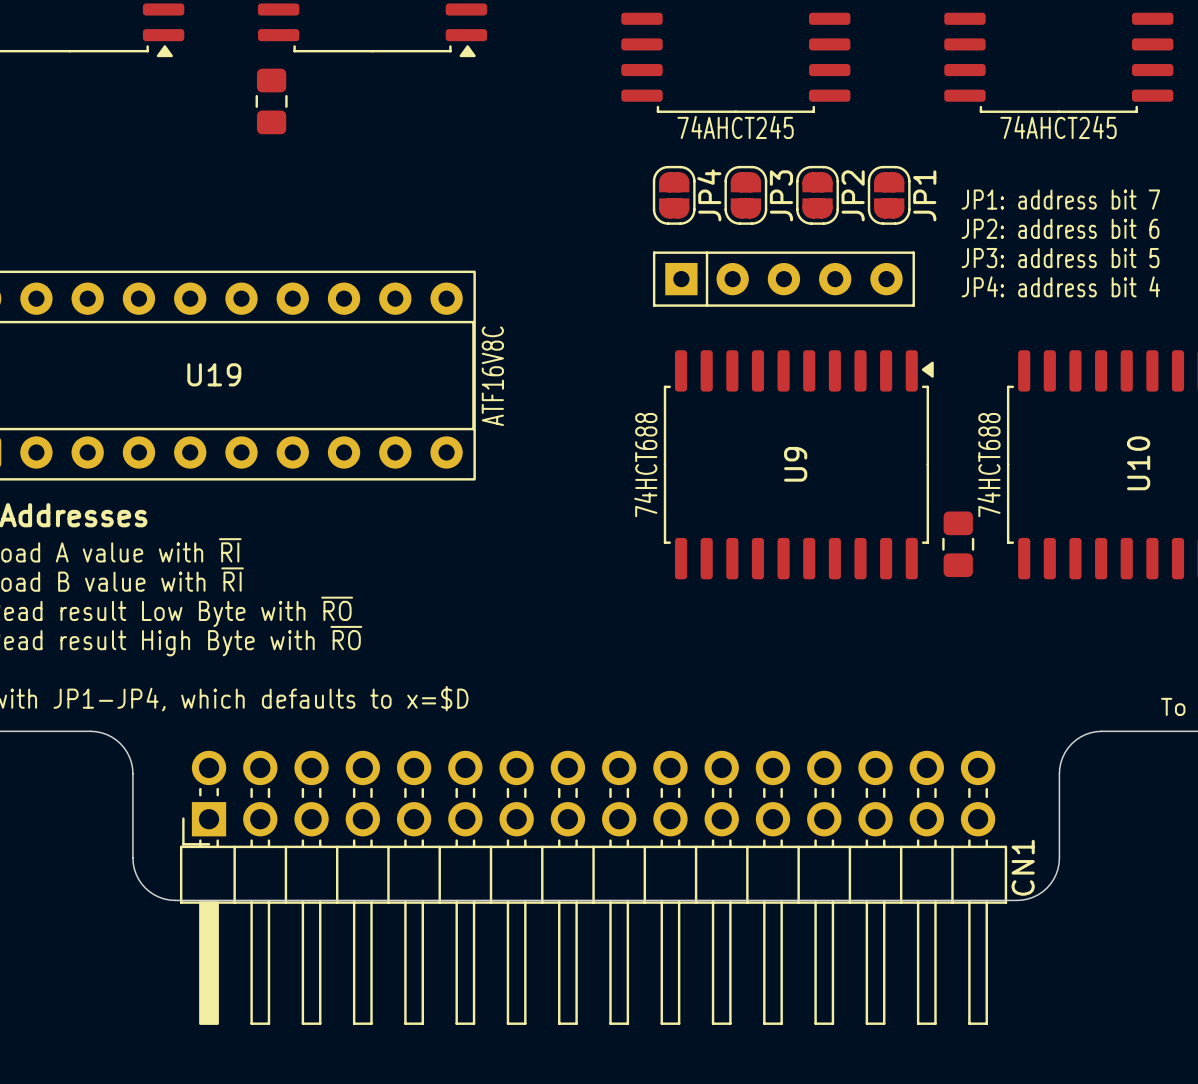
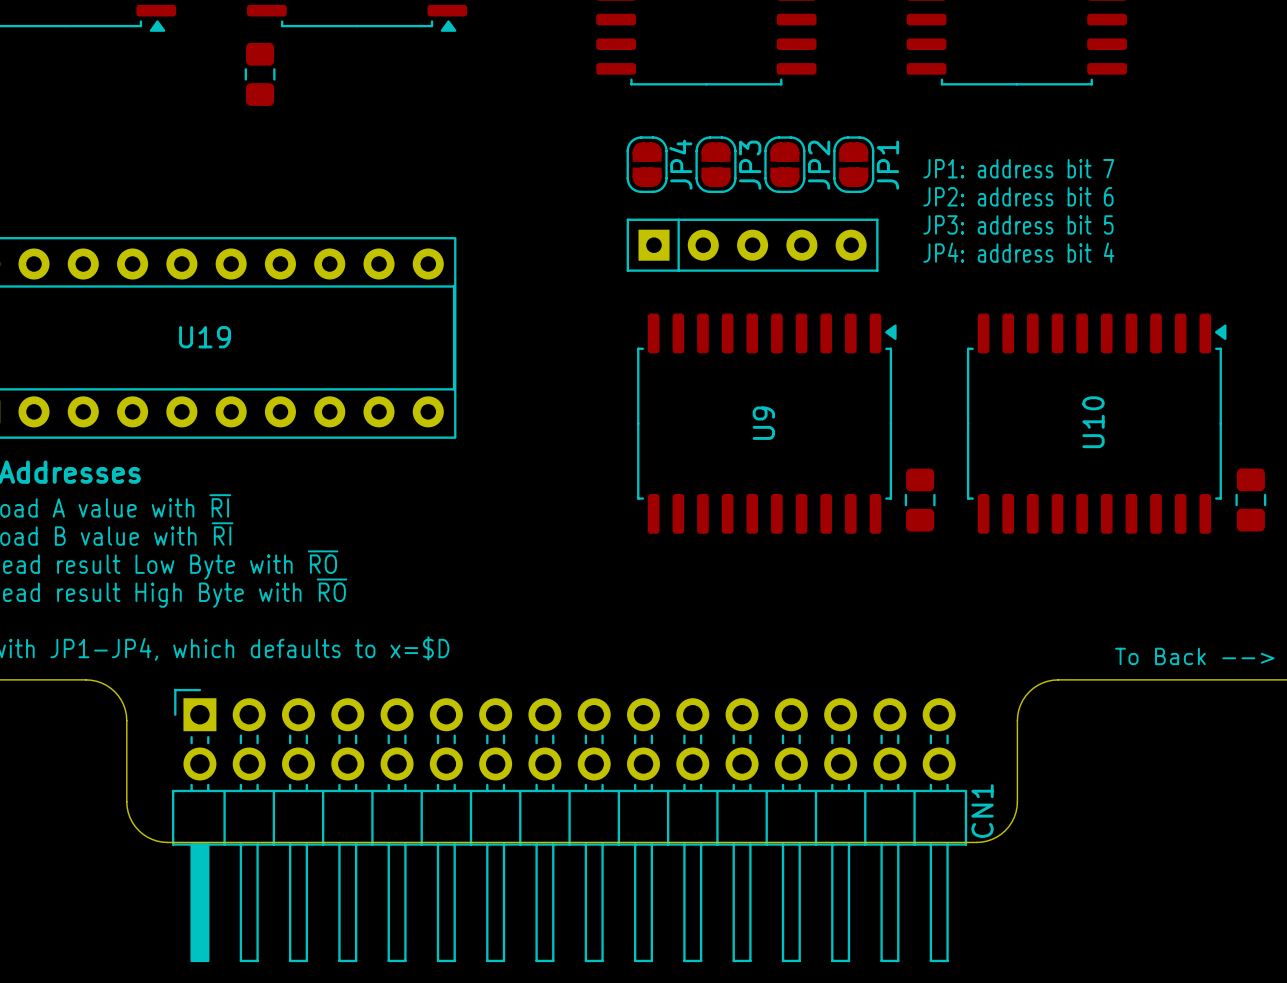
part value: 74AHCT245 (735, 127) -> none
part value: 74AHCT245 (1058, 127) -> none
U19 value: ATF16V8C (492, 376) -> none
U9 value: 74HCT688 (645, 465) -> none
U10 value: 74HCT688 (988, 465) -> none
CN1 footprint: [179, 750, 1008, 1025] -> [172, 688, 968, 963]

